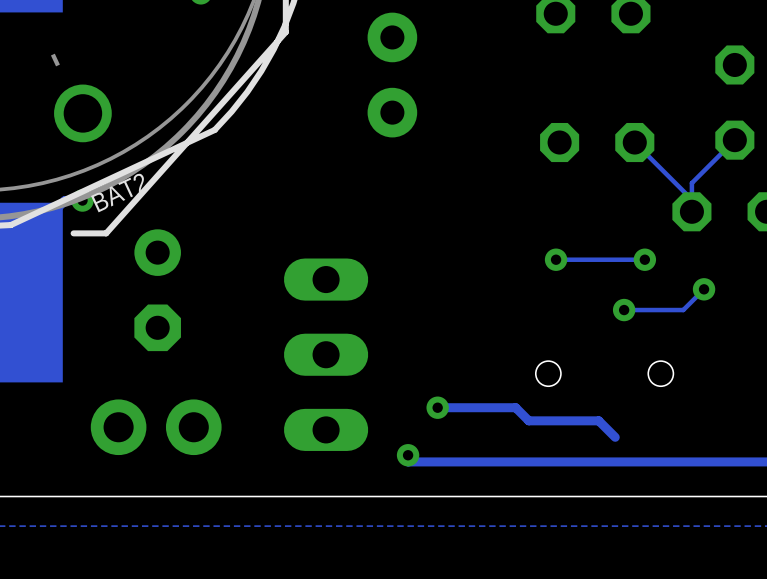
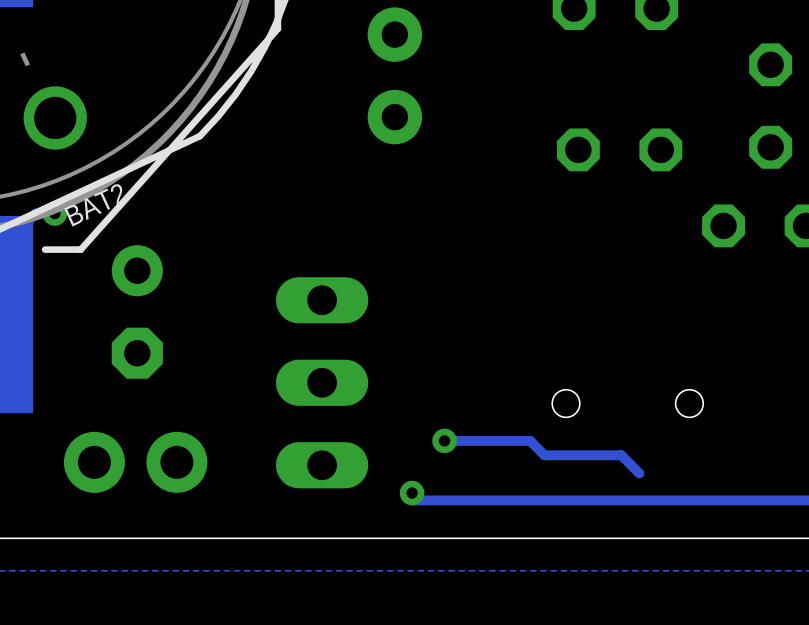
track: (734, 140) (691, 183) (691, 211) -> none
track: (634, 142) (691, 199) -> none
via: (556, 259) -> none
track: (644, 259) (556, 259) -> none
via: (644, 259) -> none
track: (704, 289) (683, 310) (624, 310) -> none
via: (704, 289) -> none
via: (624, 310) -> none

